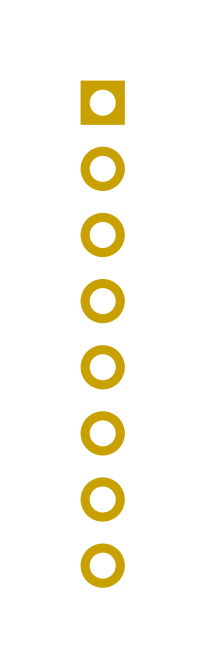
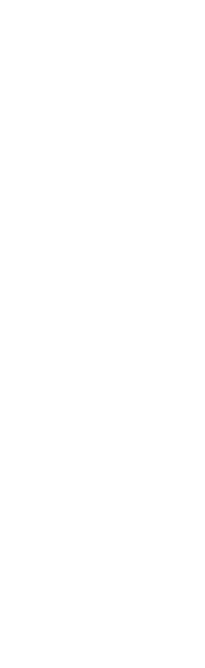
part: (102, 334) -> none

